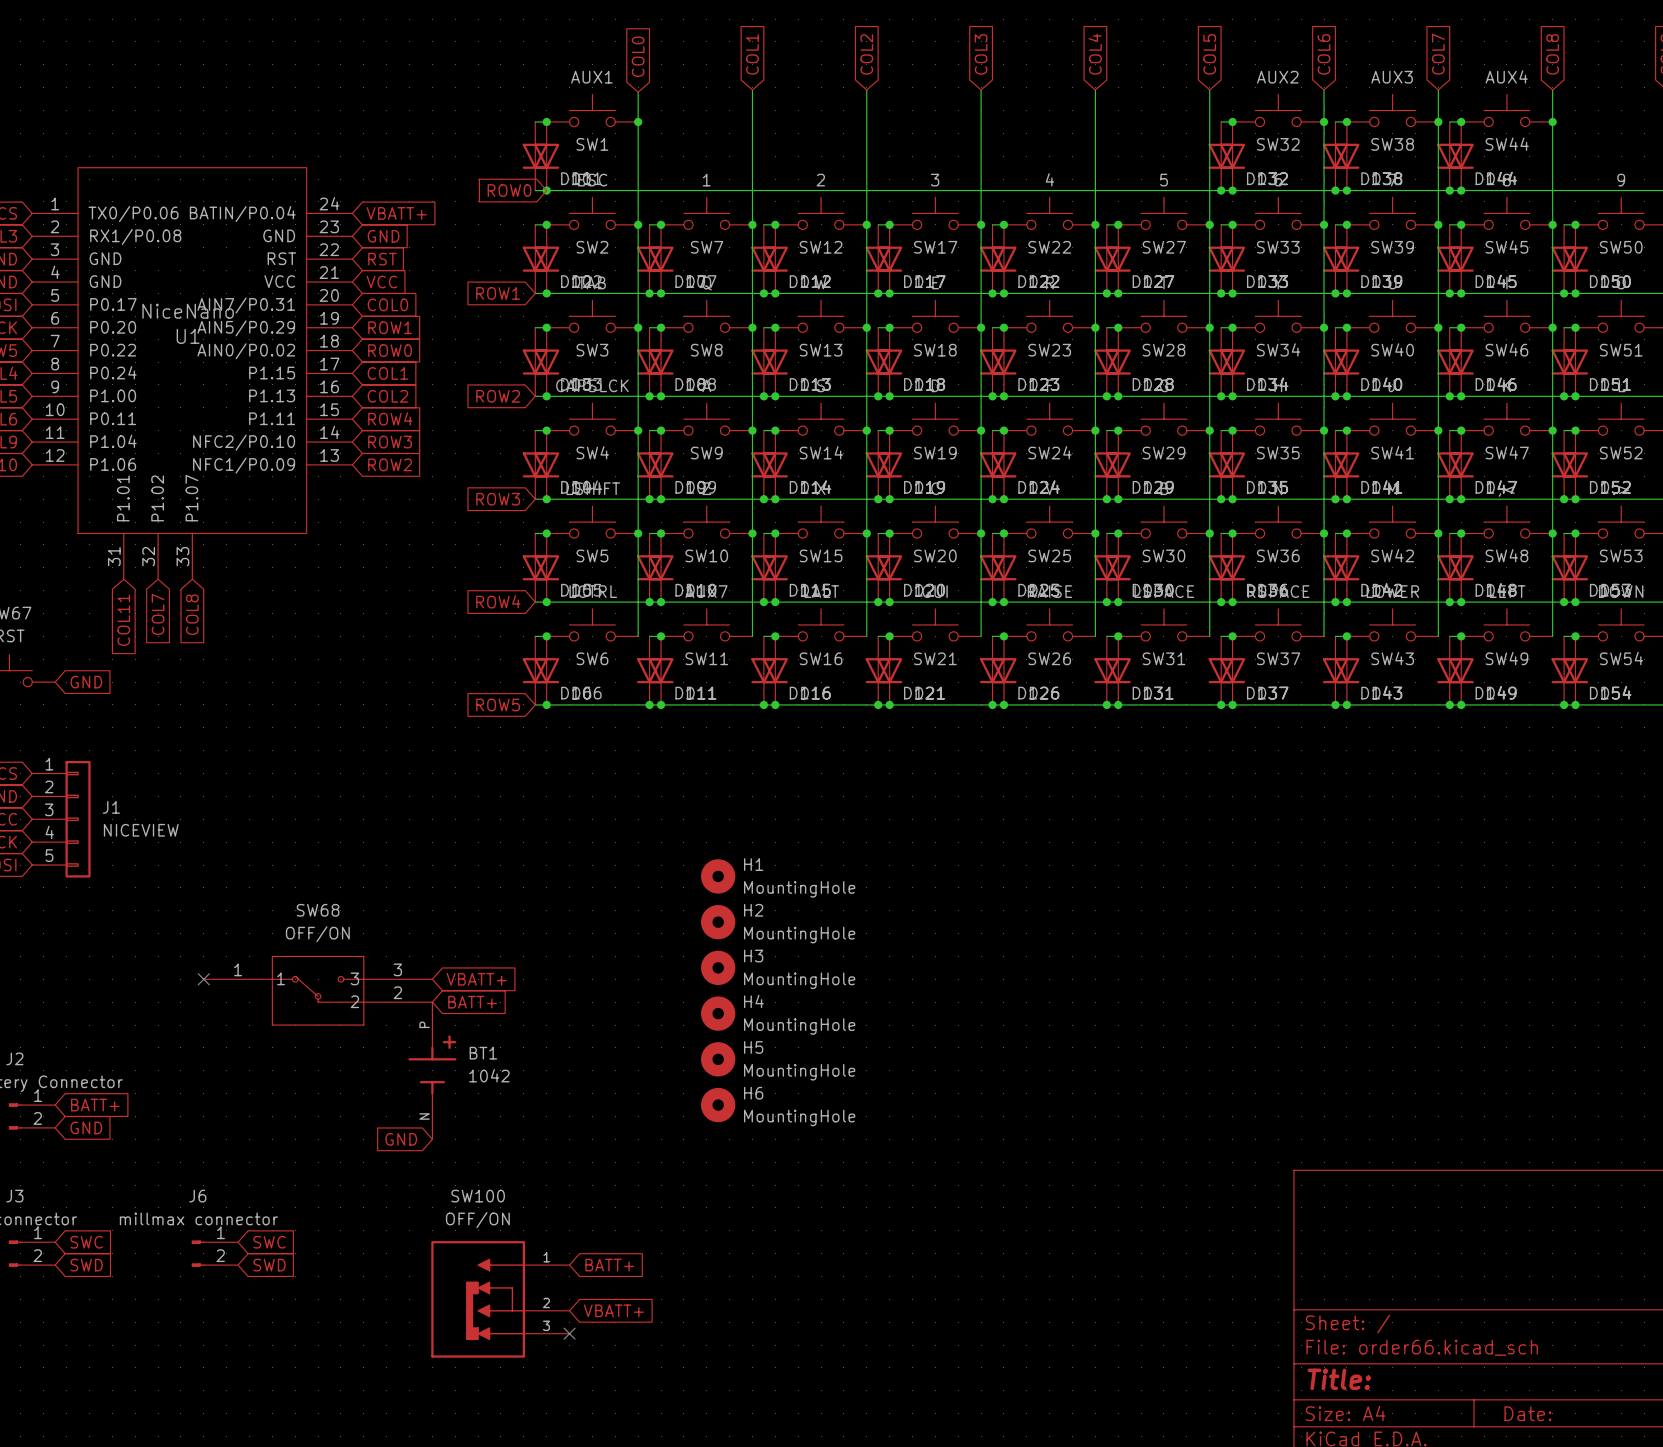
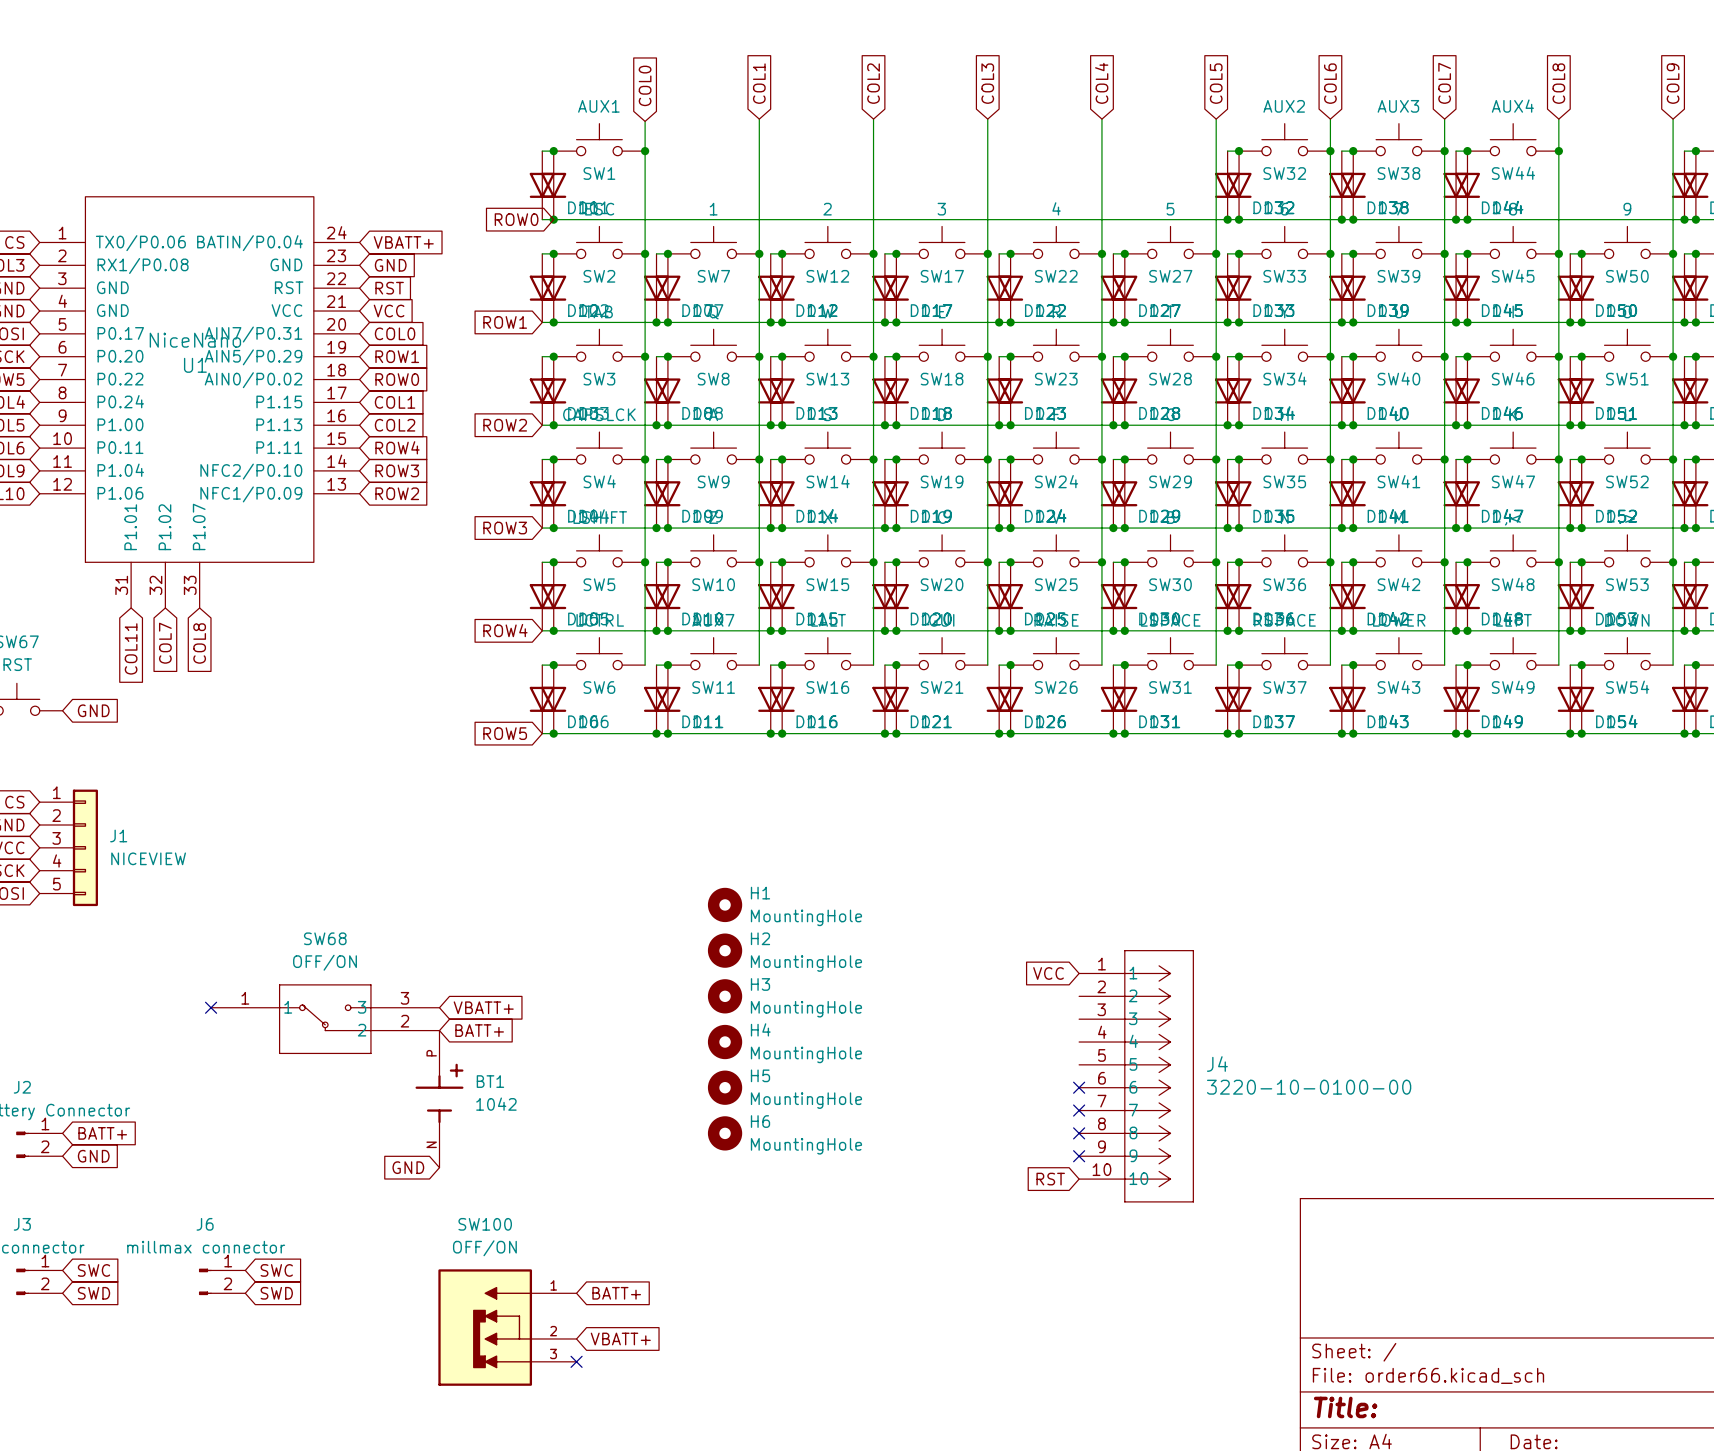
global label: none -> VCC (1048, 973)
J4: none -> 3220-10-0100-00 (1136, 1076)
no-connect mark: none -> (1079, 1087)
no-connect mark: none -> (1079, 1110)
no-connect mark: none -> (1079, 1133)
no-connect mark: none -> (1079, 1156)
global label: none -> RST (1050, 1179)

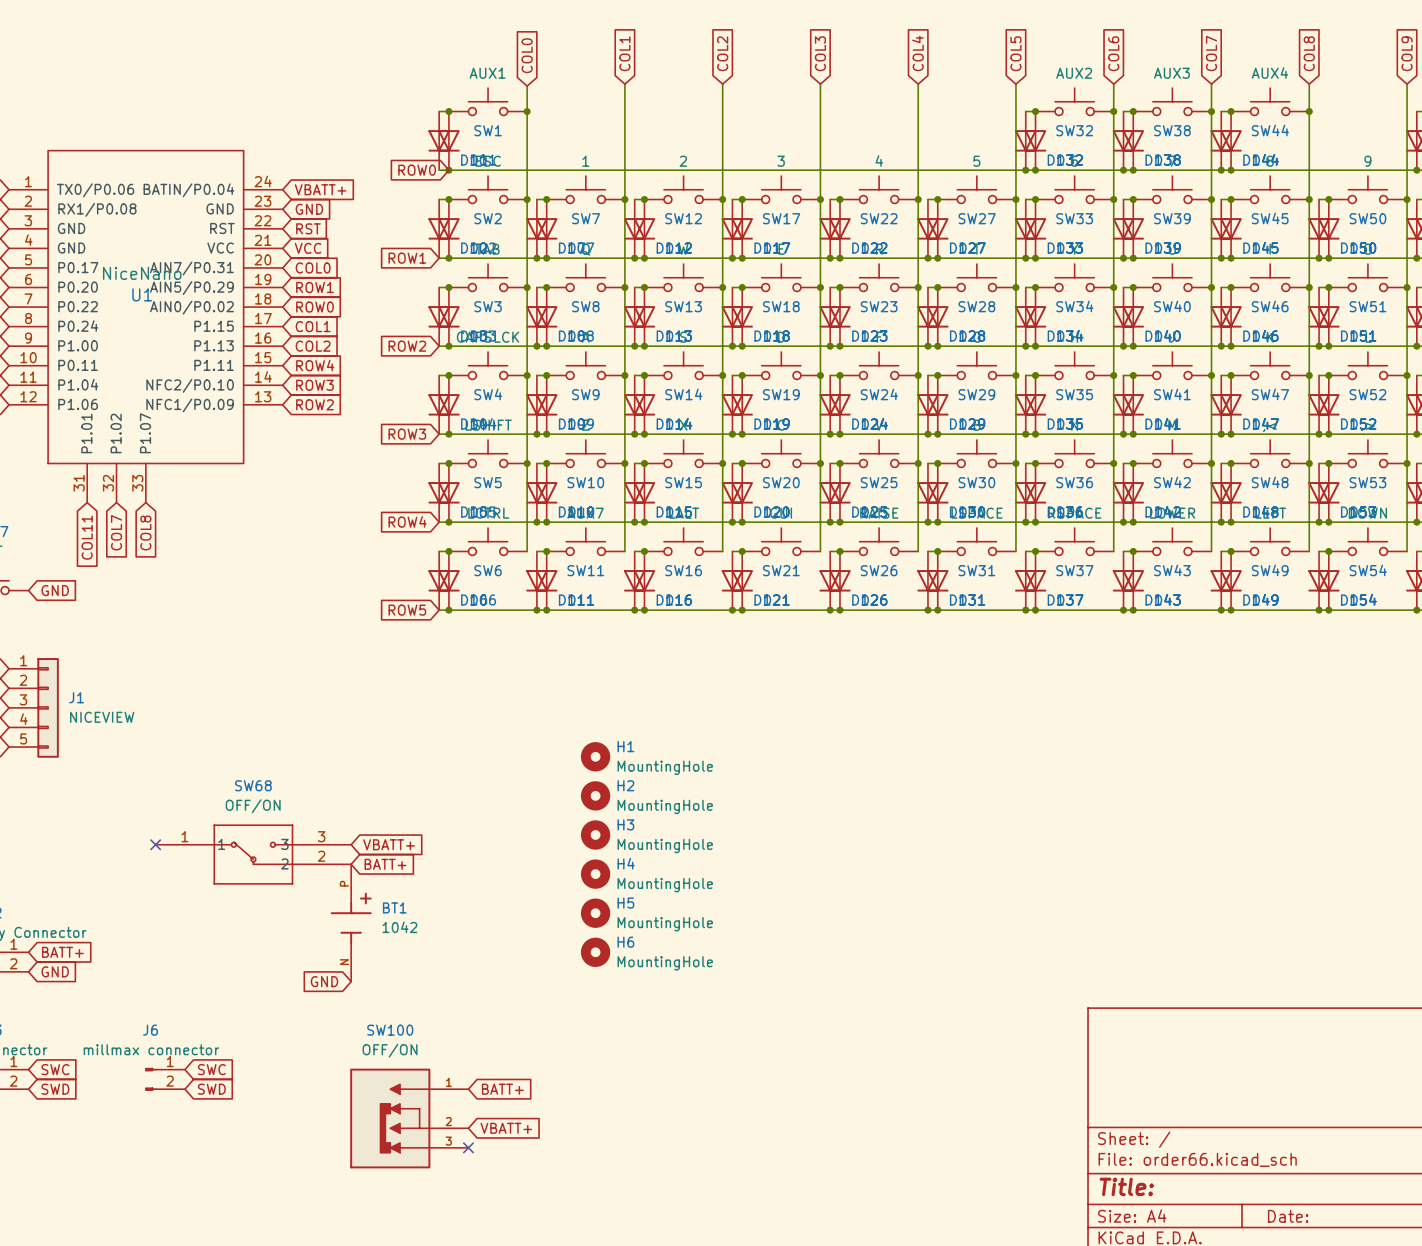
global label: VCC (1048, 973) -> none
J4: 3220-10-0100-00 (1136, 1076) -> none
no-connect mark: (1079, 1087) -> none
no-connect mark: (1079, 1110) -> none
no-connect mark: (1079, 1133) -> none
no-connect mark: (1079, 1156) -> none
global label: RST (1050, 1179) -> none

